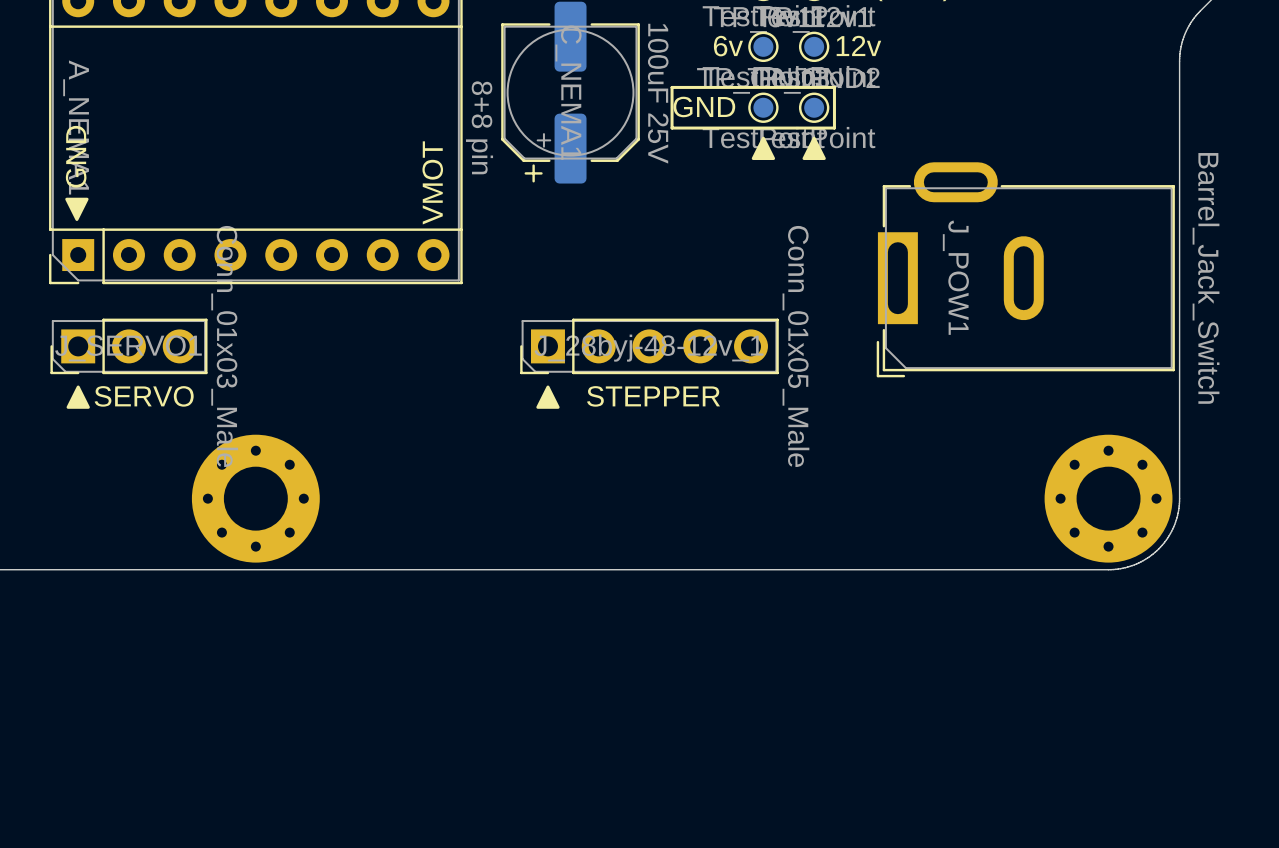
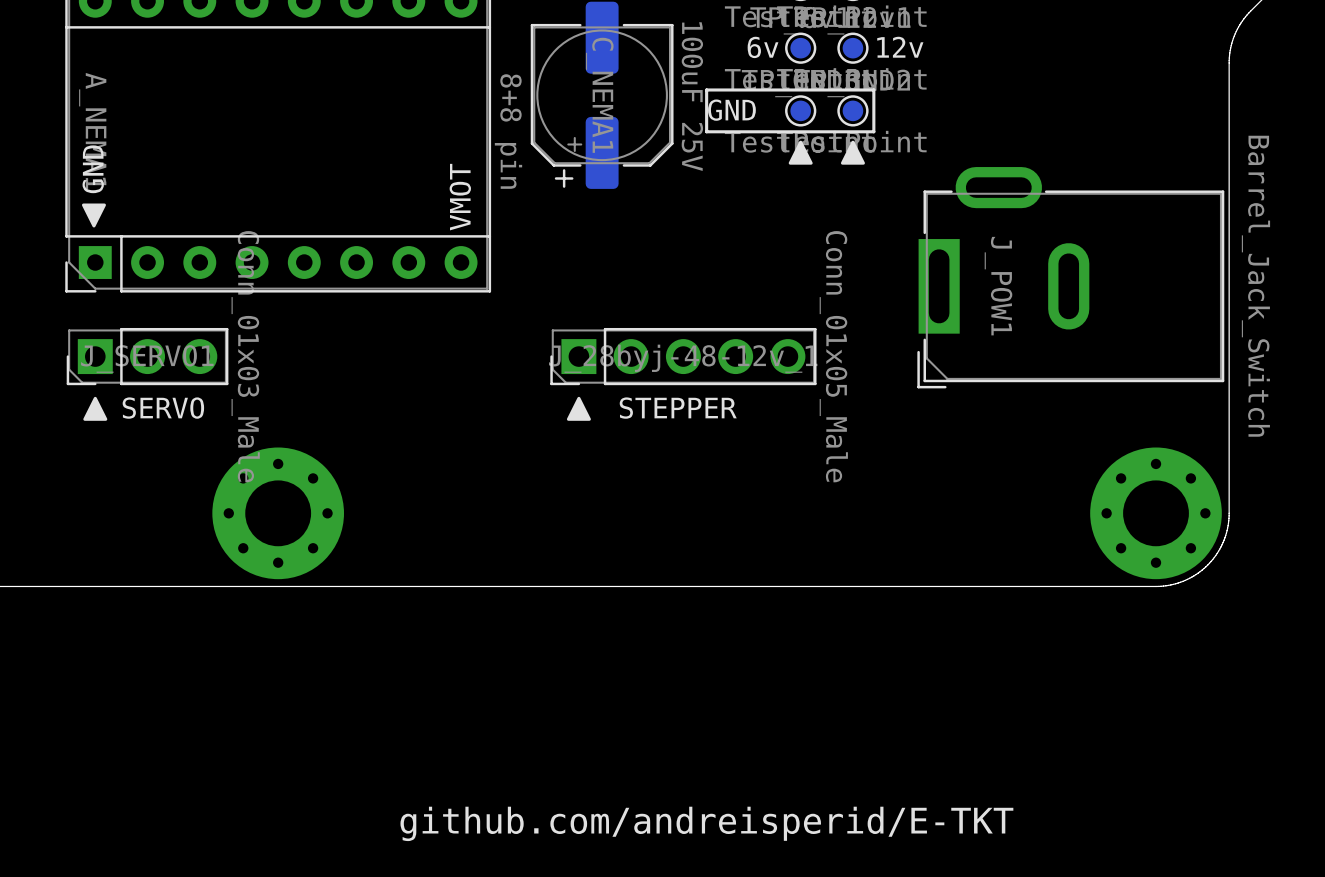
text: none -> github.com/andreisperid/E-TKT (706, 823)

